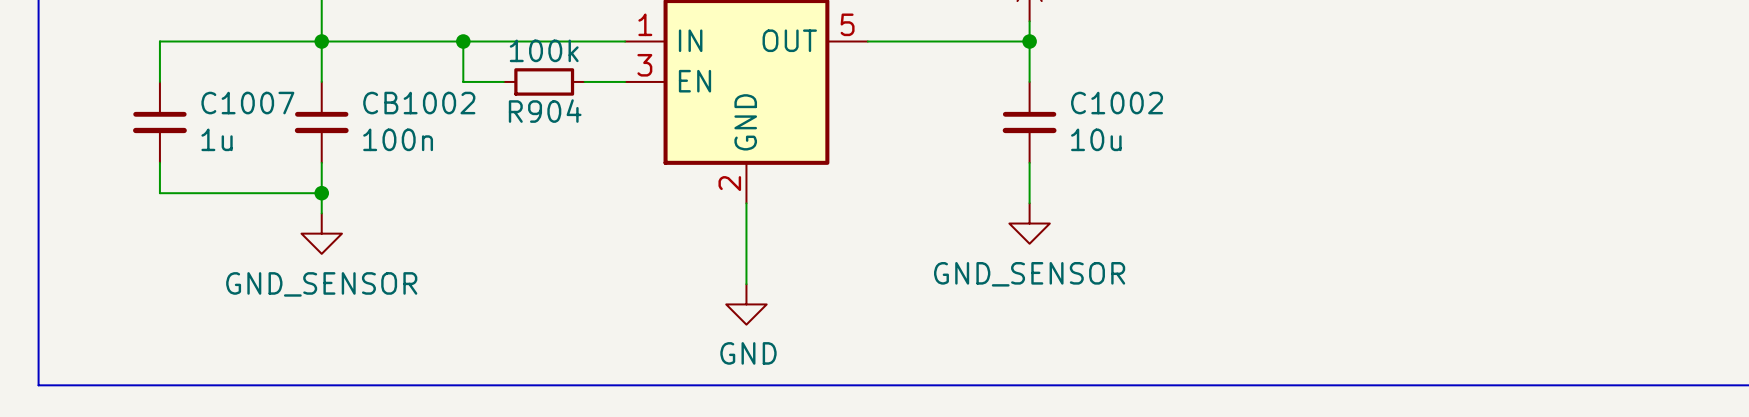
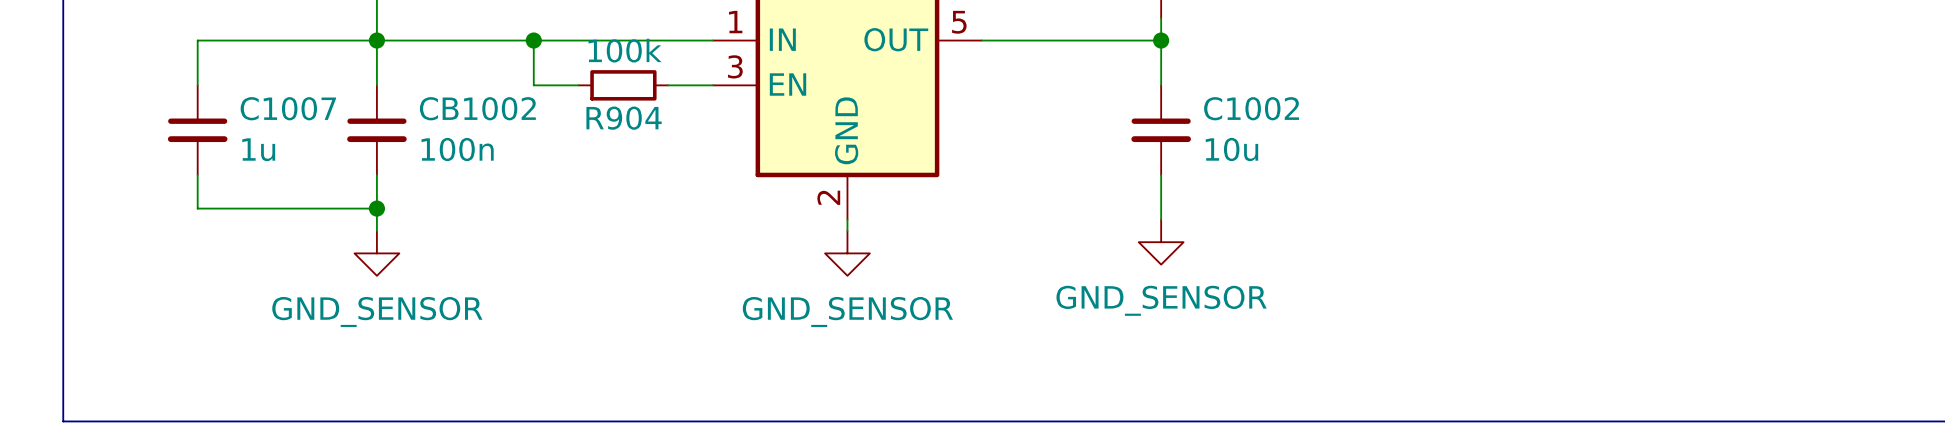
wire: (746, 213) (746, 284) -> none
power symbol: none -> GND_SENSOR (847, 253)
power symbol: GND (746, 304) -> none

